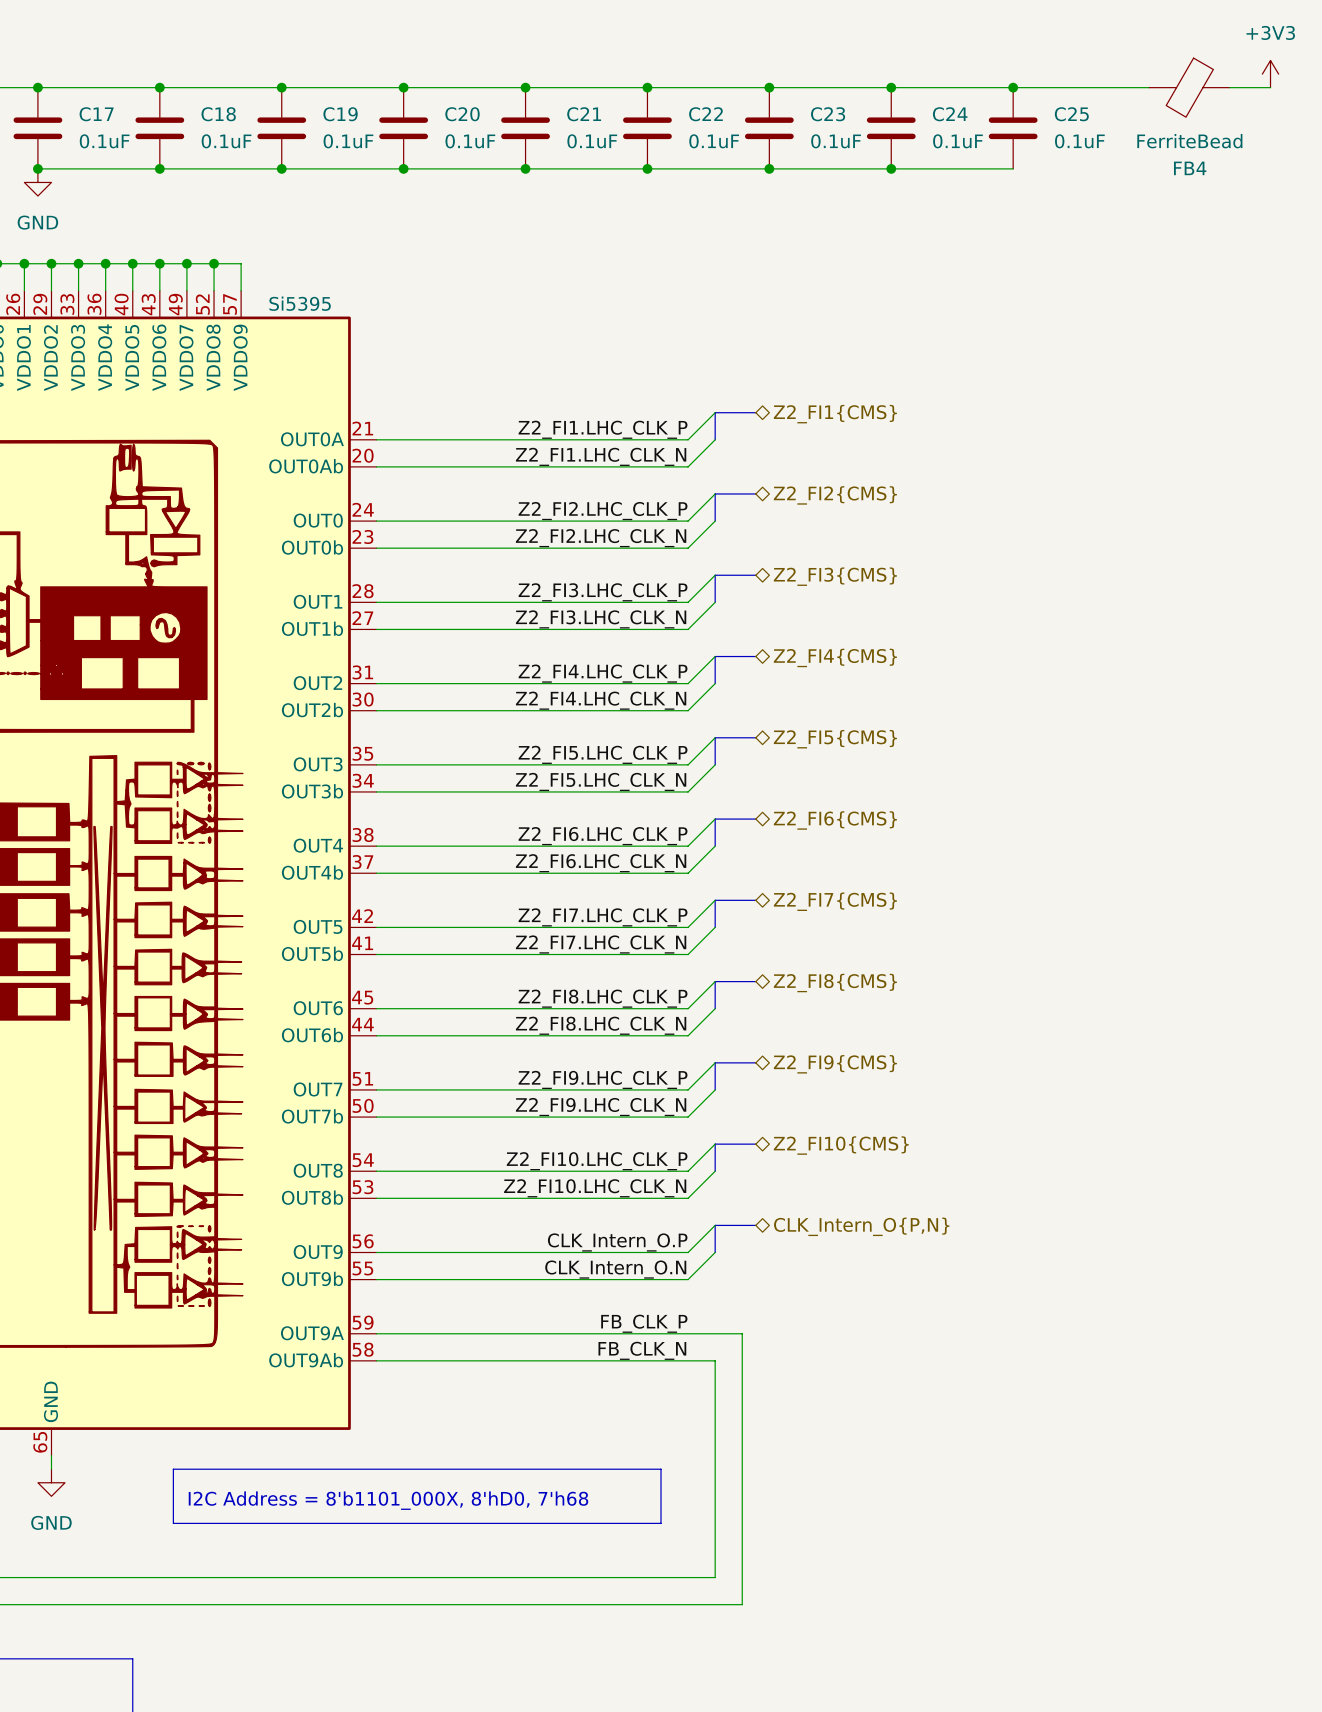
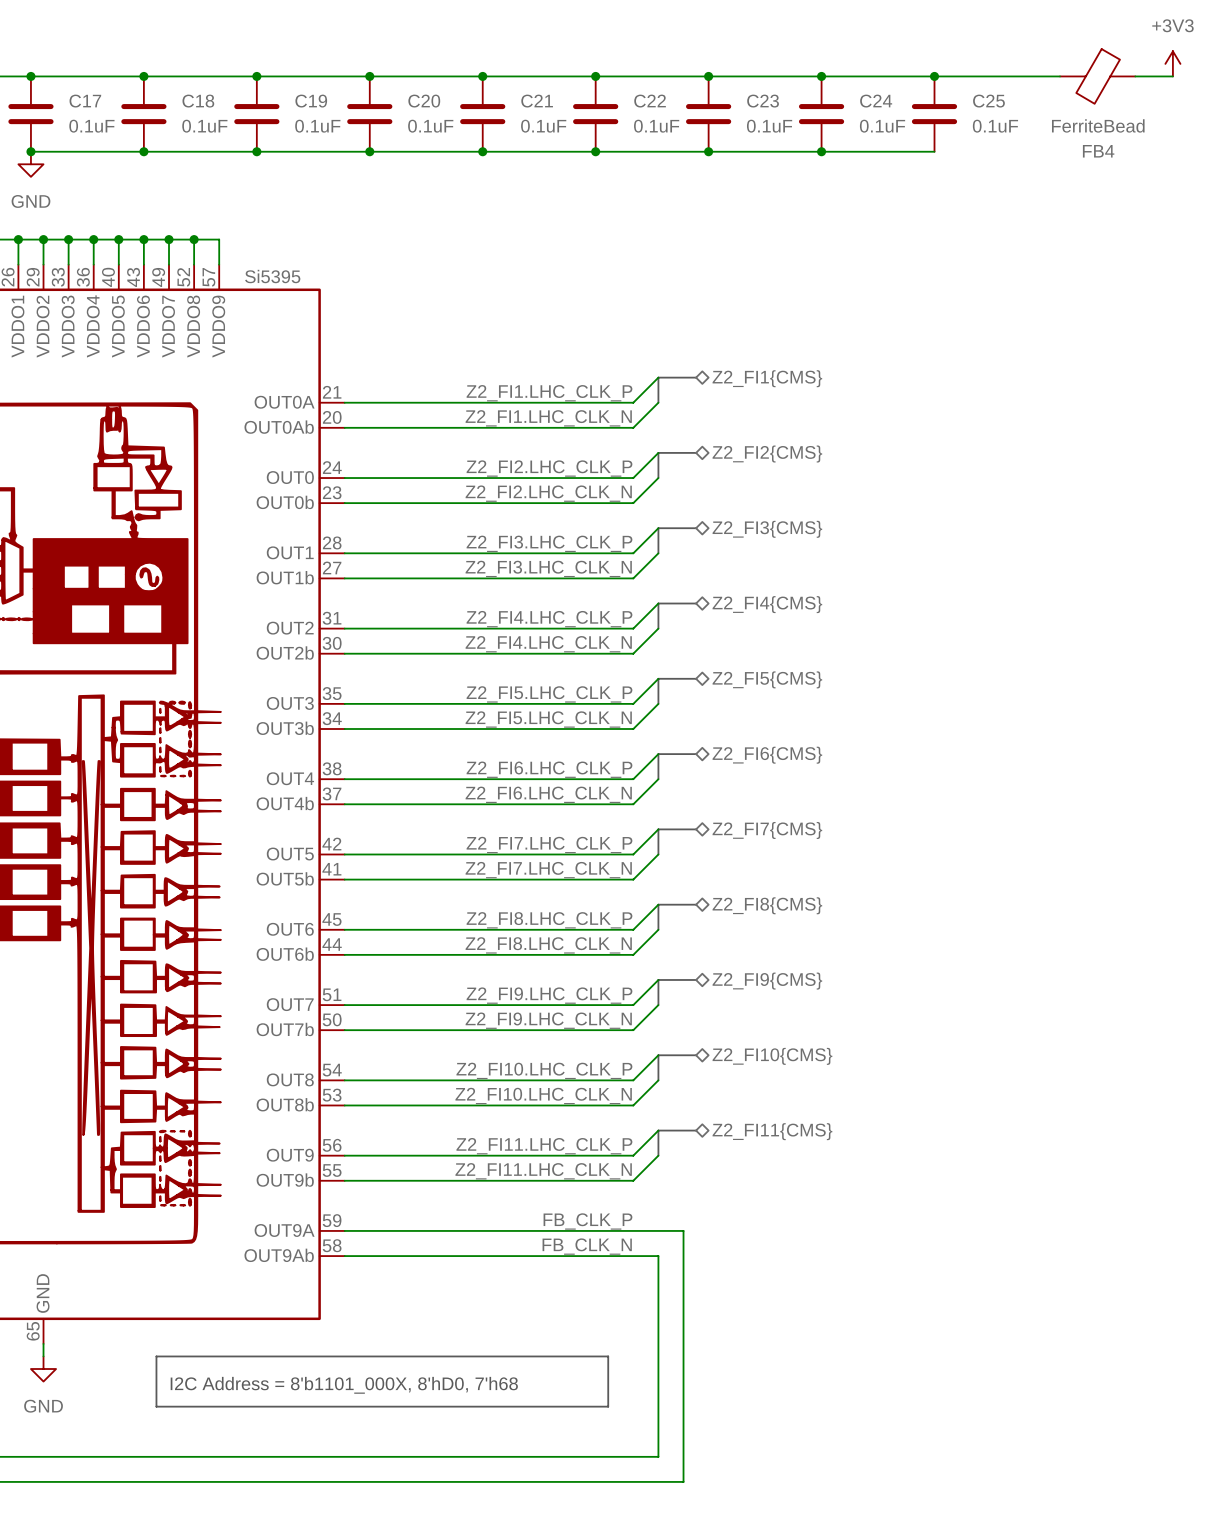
hierarchical label: CLK_Intern_O{P,N} (861, 1226) -> Z2_FI11{CMS} (772, 1131)
label: CLK_Intern_O.P (617, 1242) -> Z2_FI11.LHC_CLK_P (544, 1146)
label: CLK_Intern_O.N (615, 1269) -> Z2_FI11.LHC_CLK_N (543, 1171)

